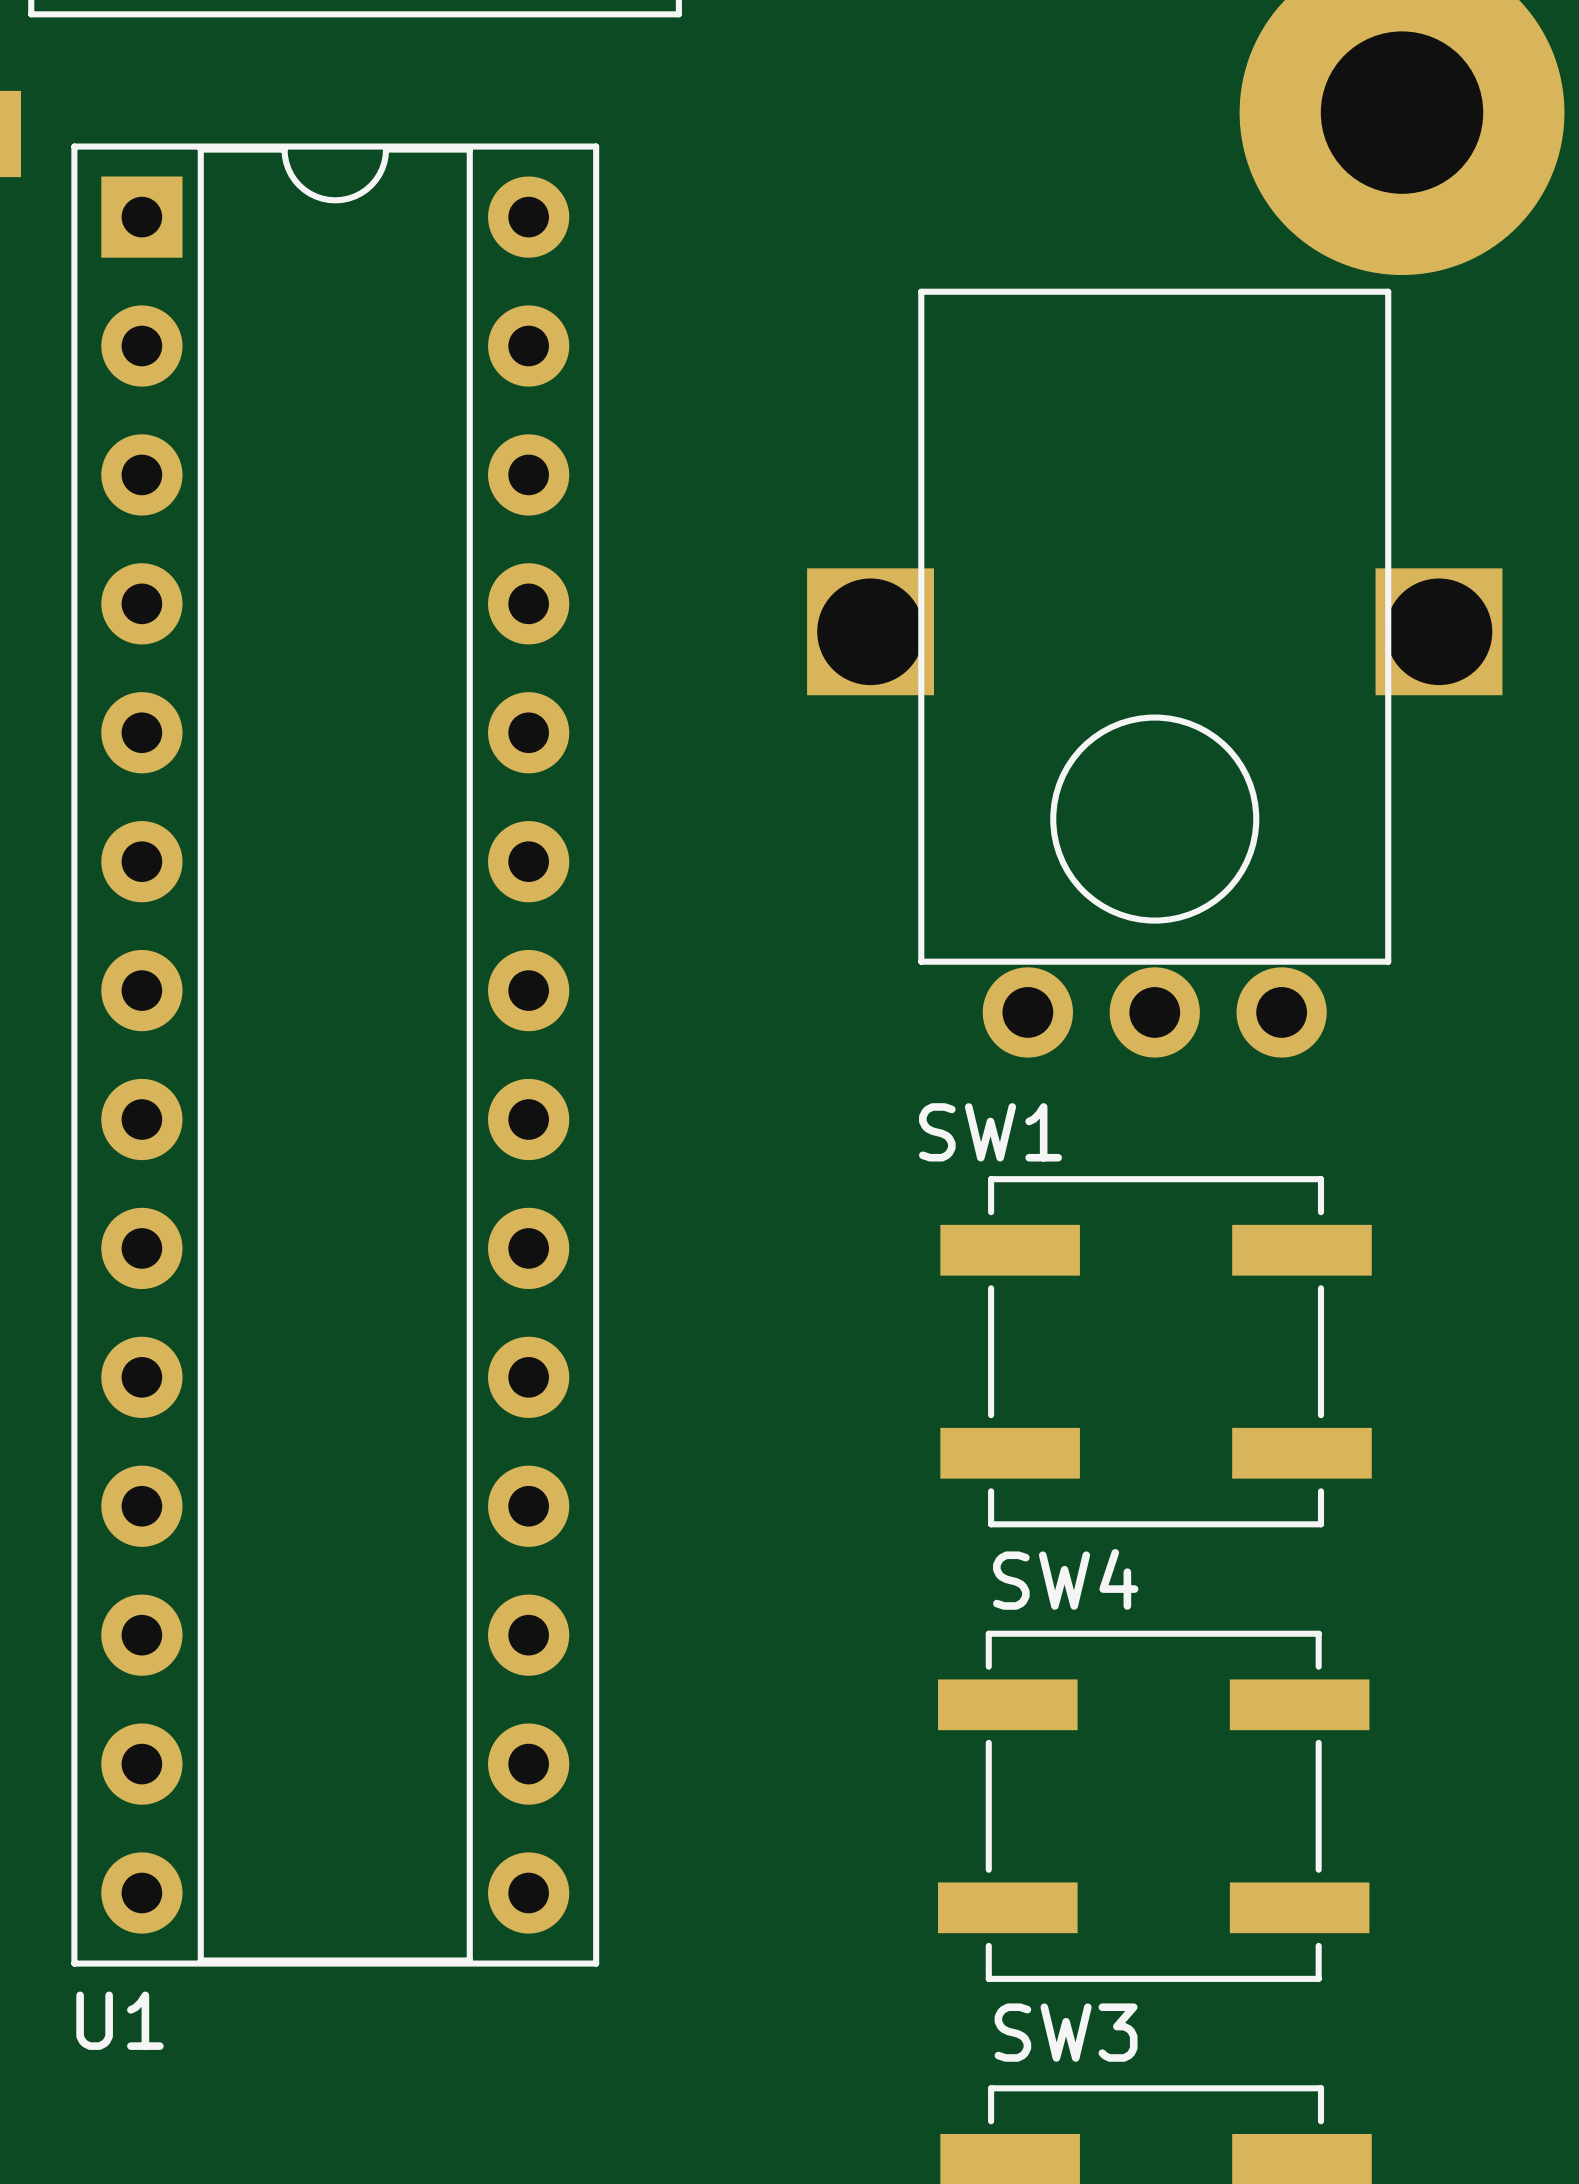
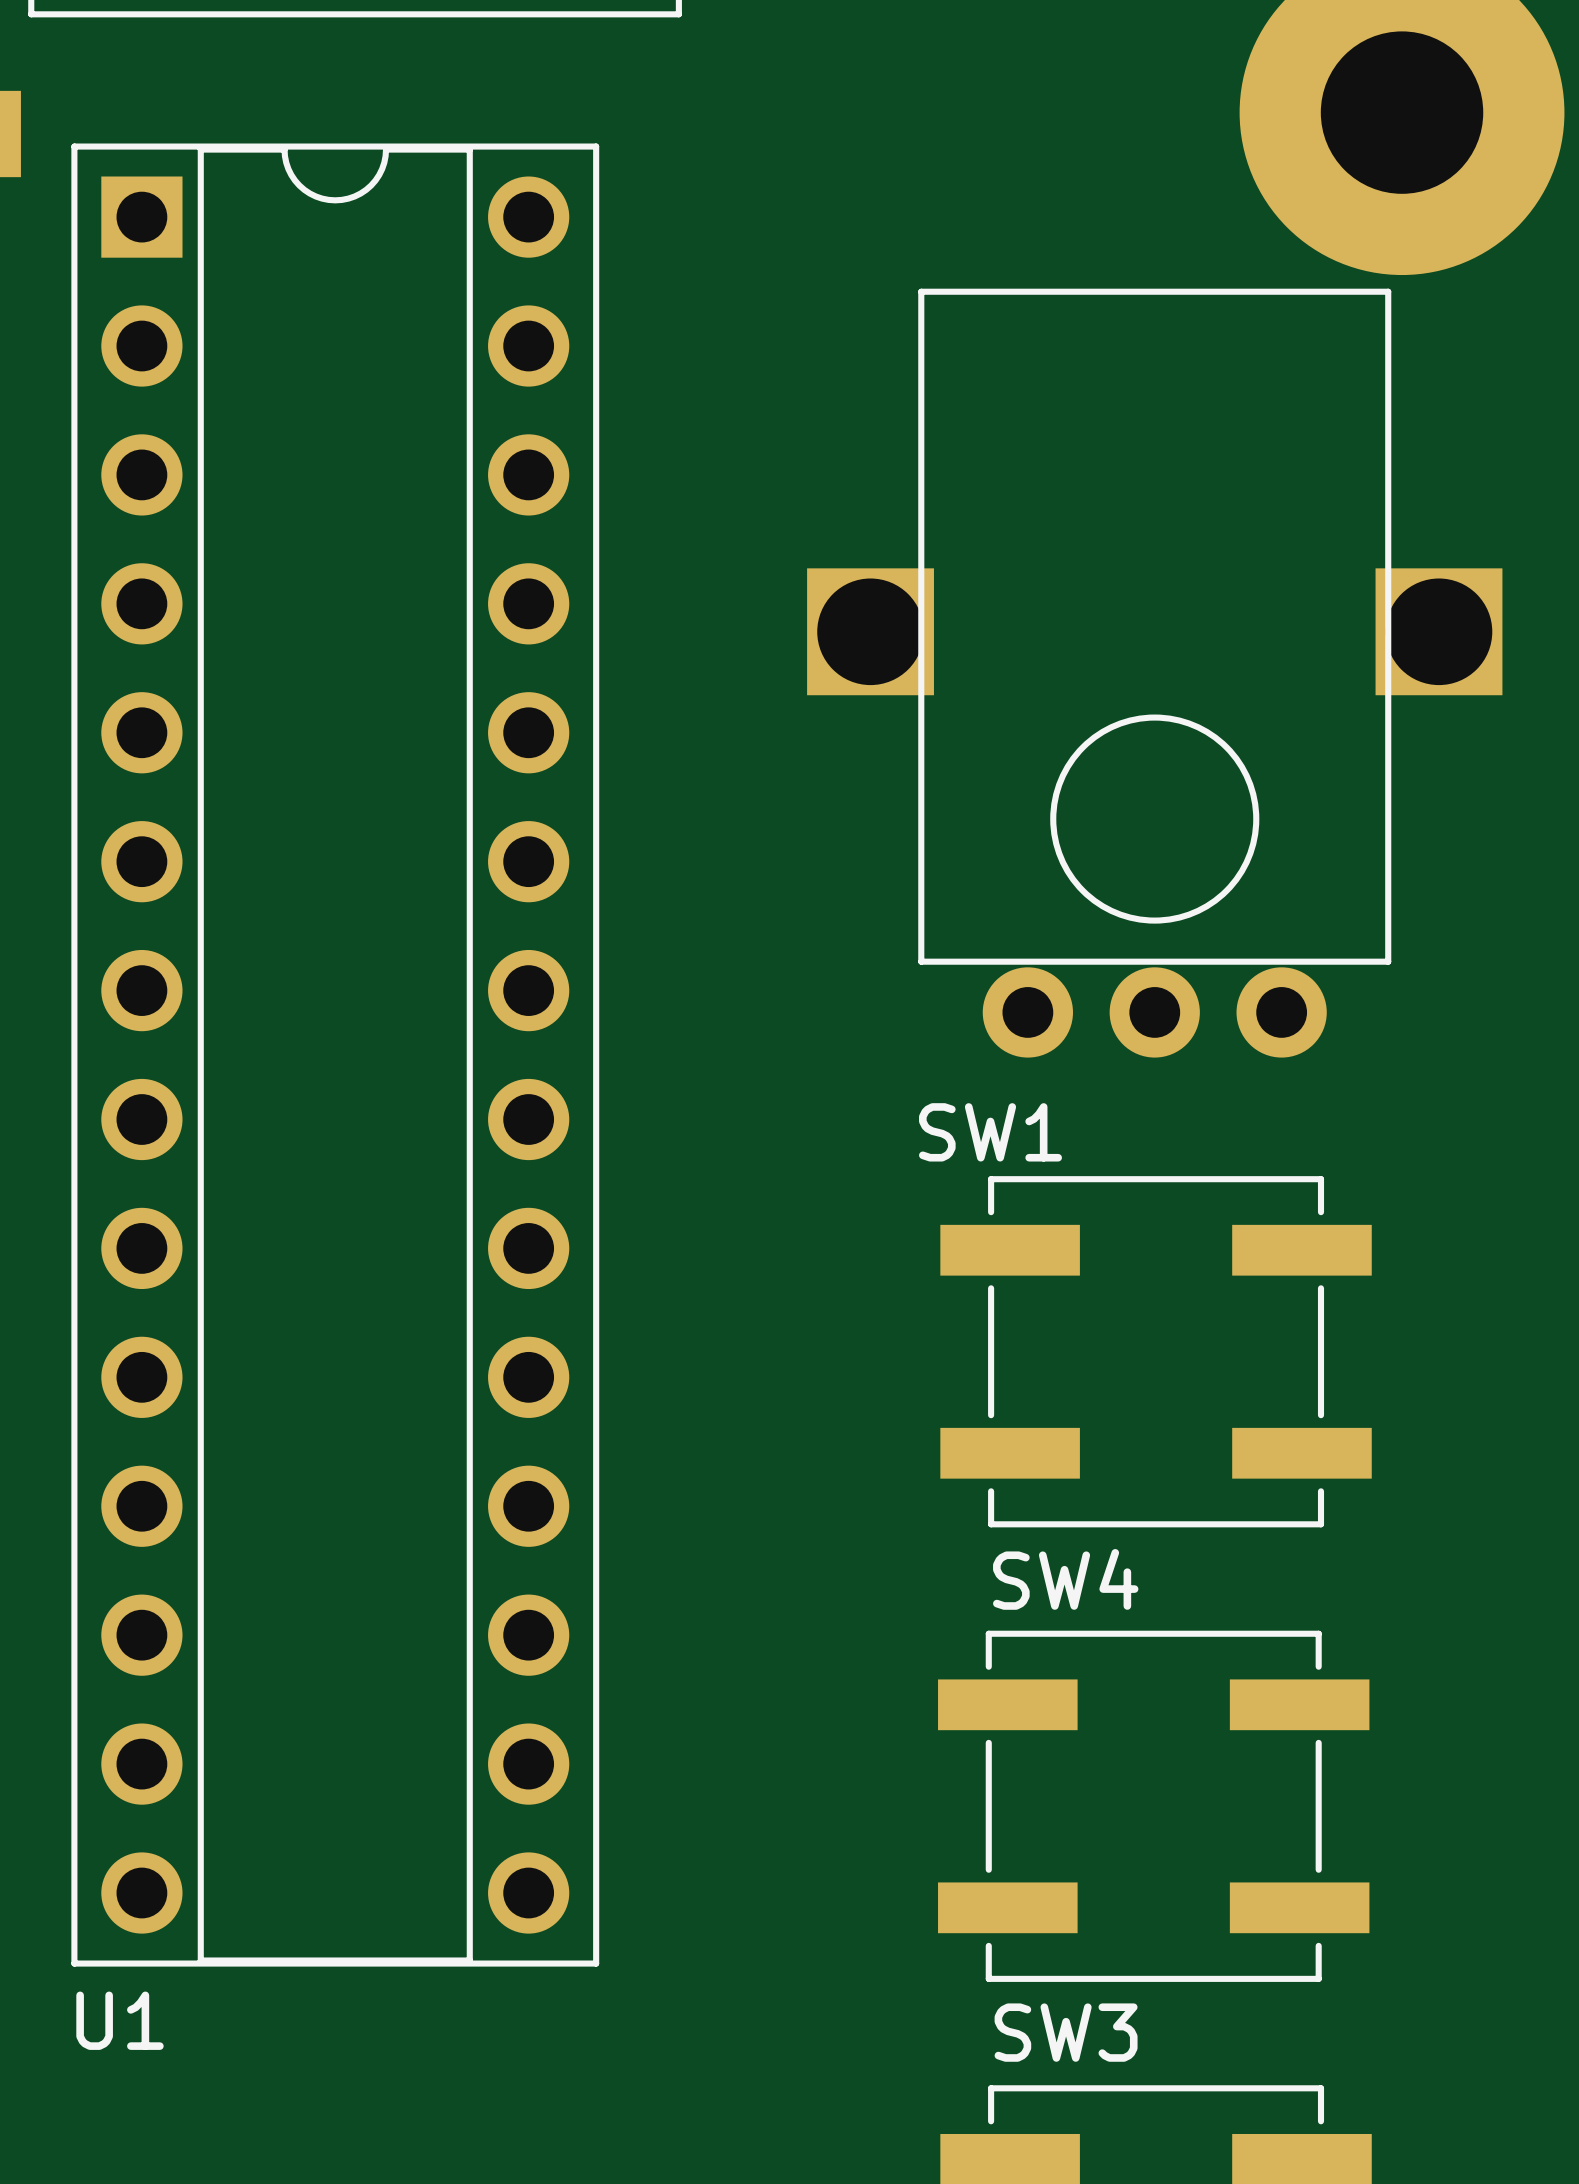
U1 footprint: [71, 143, 600, 1967] -> [71, 143, 600, 1967]

